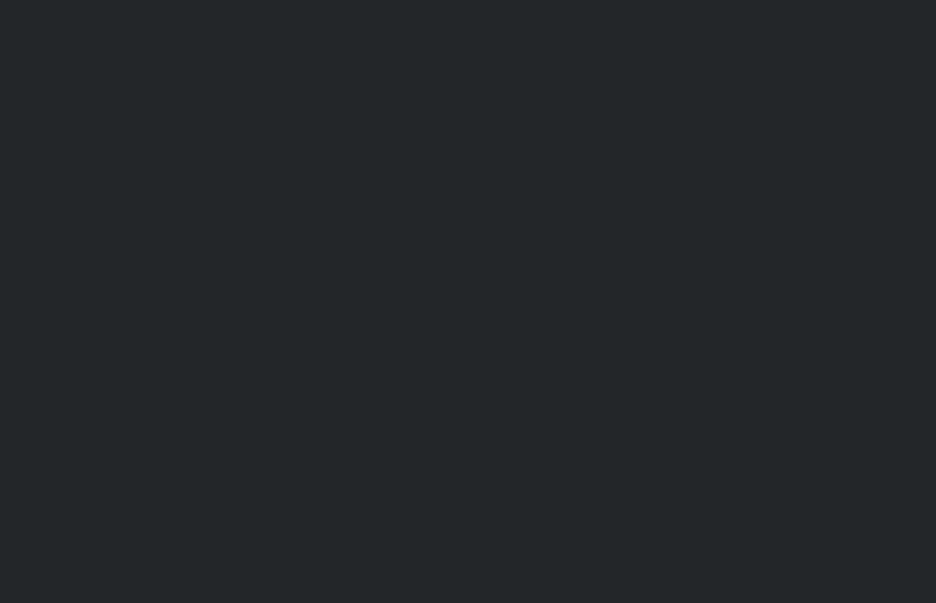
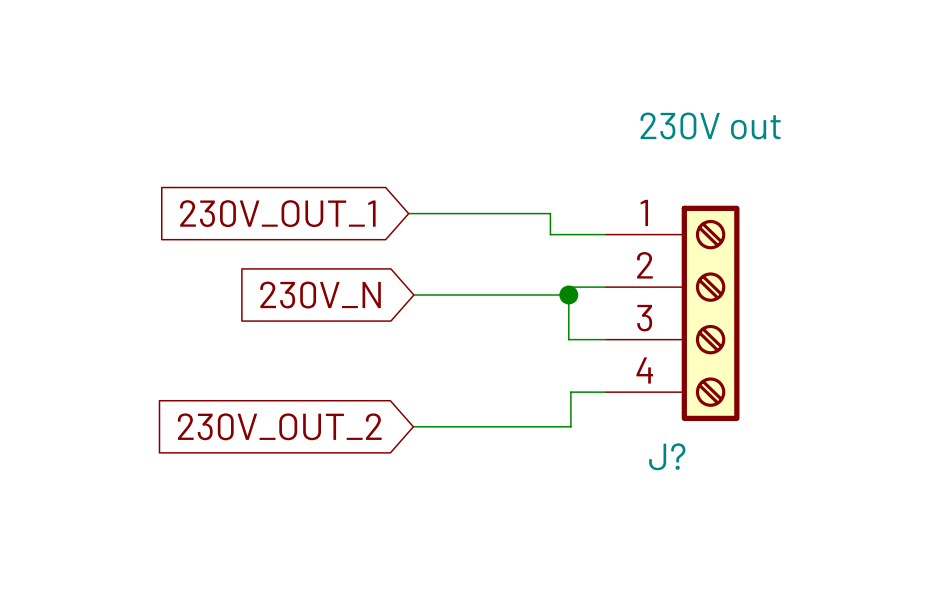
global label: none -> 230V_OUT_1 (277, 213)
wire: none -> (408, 213) (550, 213) (550, 234) (605, 234)
wire: none -> (605, 287) (568, 287) (568, 339) (605, 339)
wire: none -> (413, 294) (568, 294)
junction: none -> (568, 294)
global label: none -> 230V_N (320, 295)
J?: none -> 230V out (672, 313)
wire: none -> (605, 392) (570, 392) (570, 426) (413, 426)
global label: none -> 230V_OUT_2 (279, 426)

